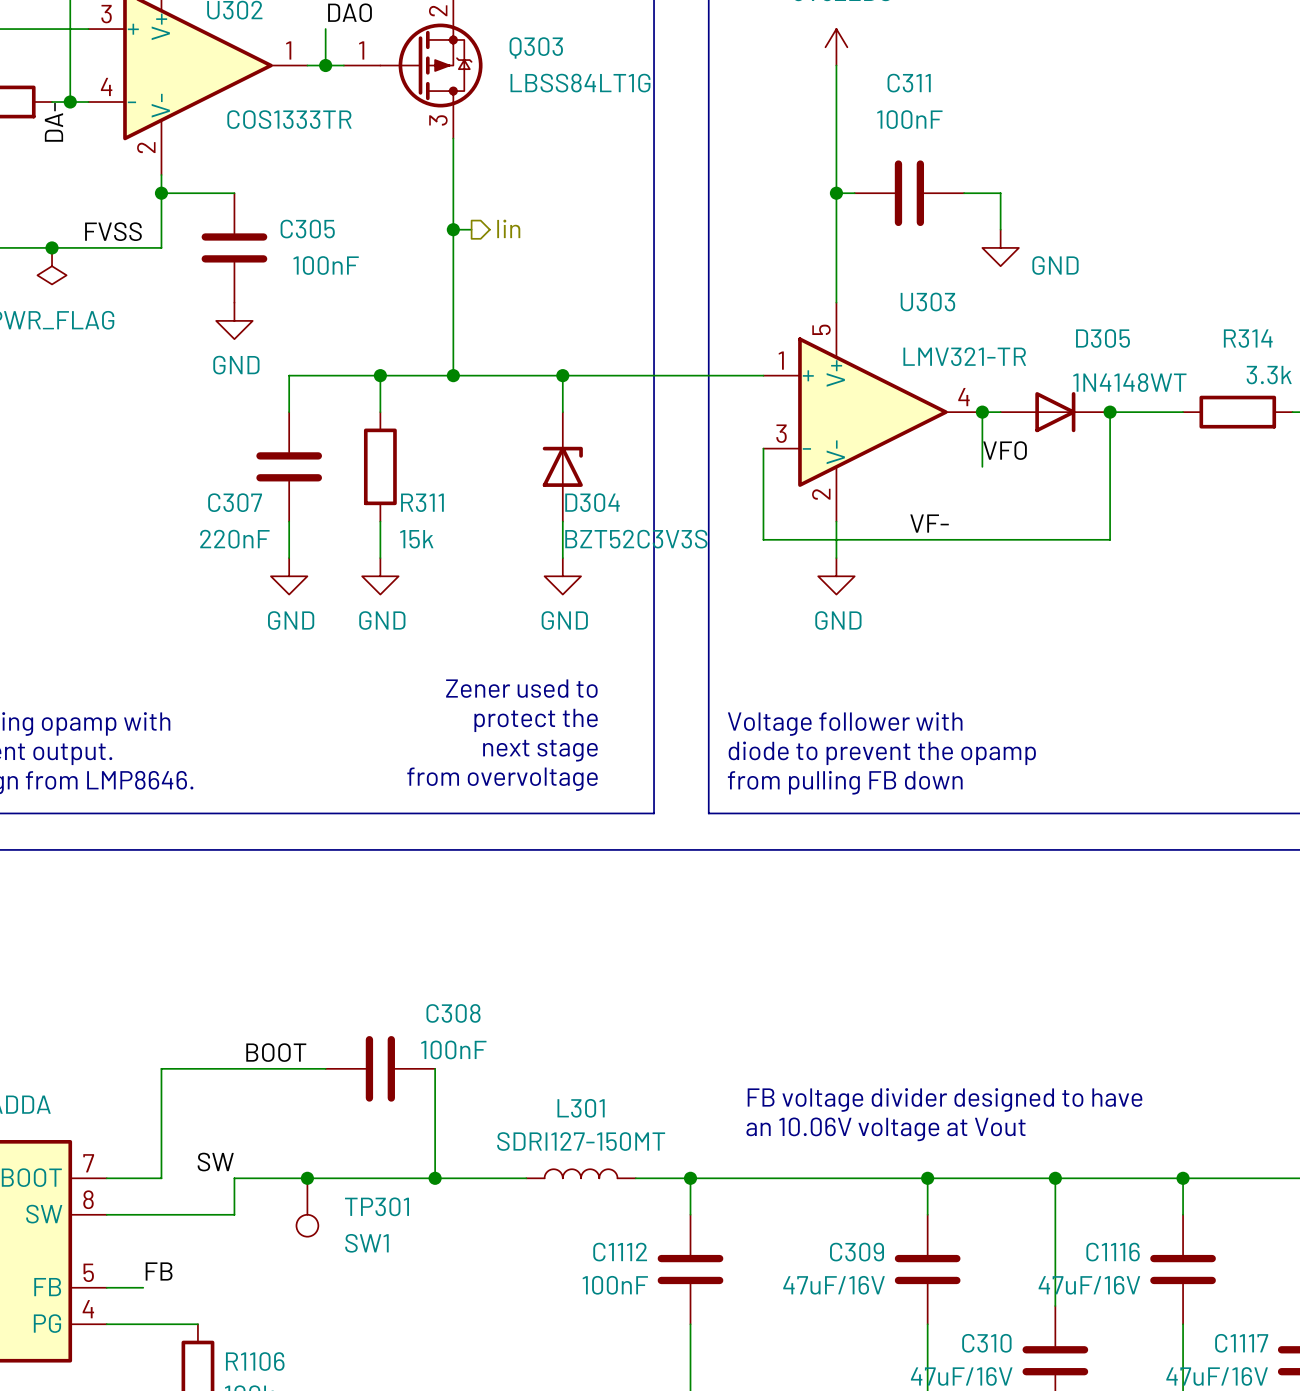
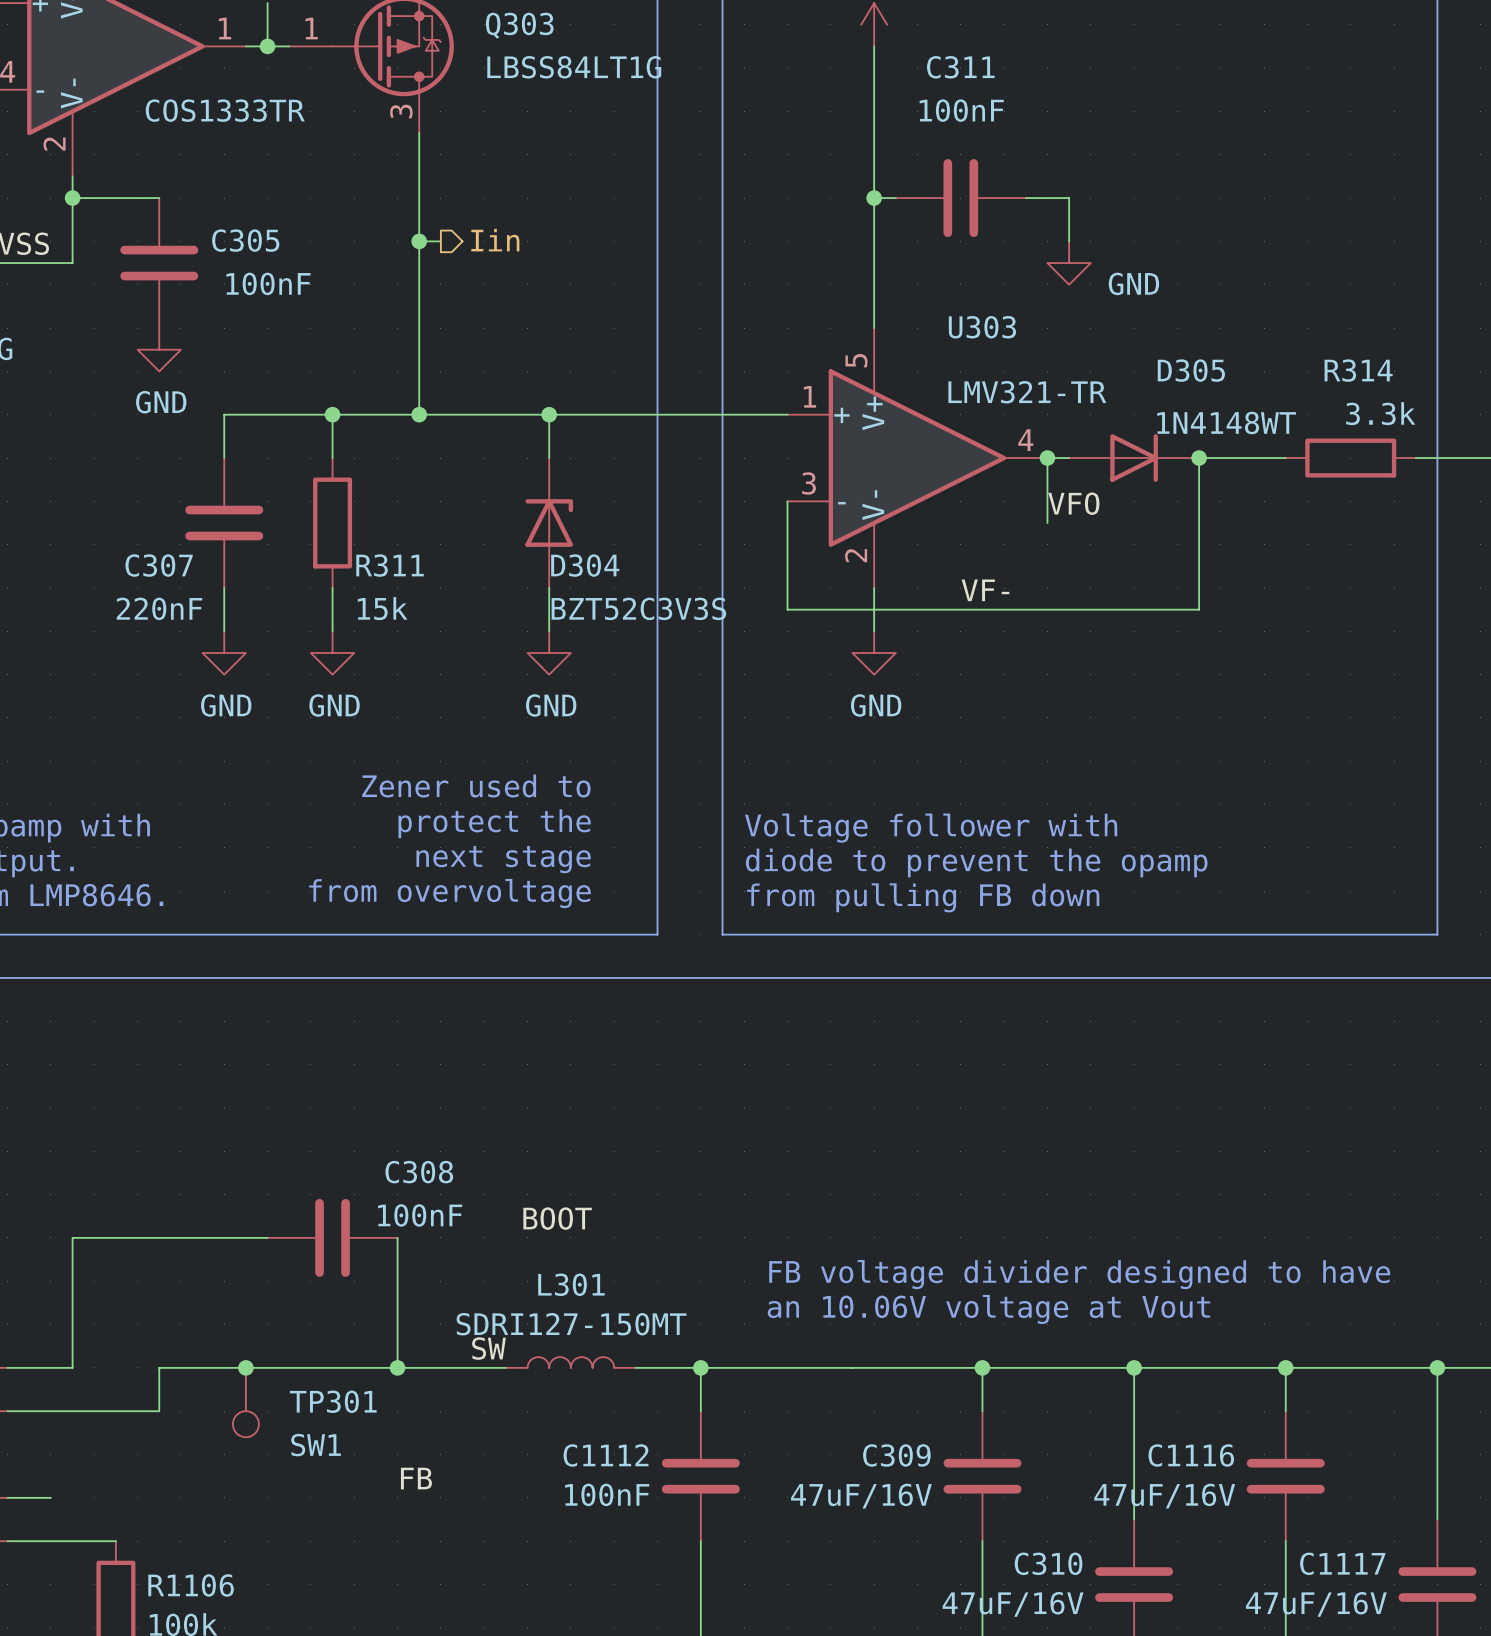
label position: BOOT (276, 1052) -> BOOT (557, 1218)
label position: SW (215, 1162) -> SW (488, 1348)
label position: FB (159, 1271) -> FB (416, 1478)

